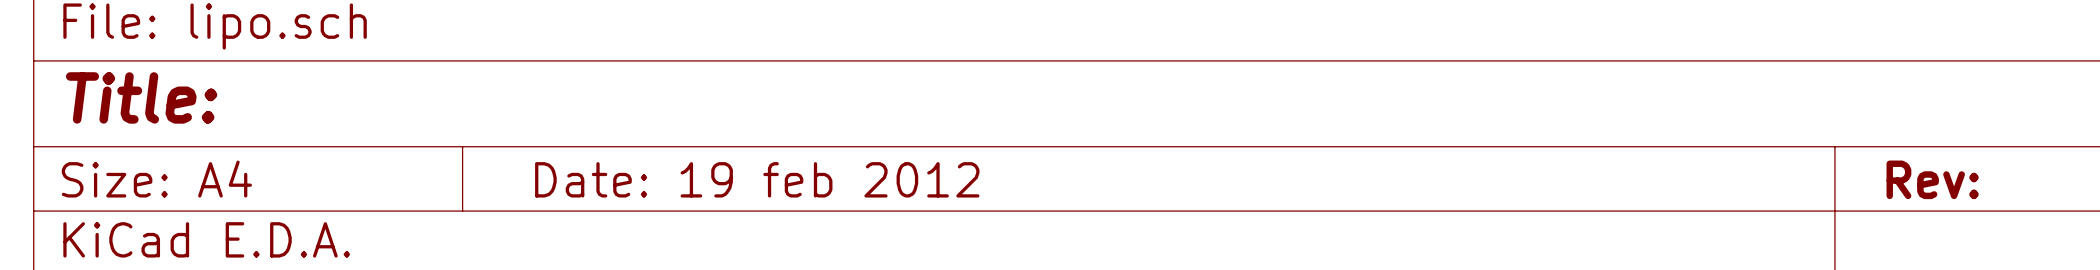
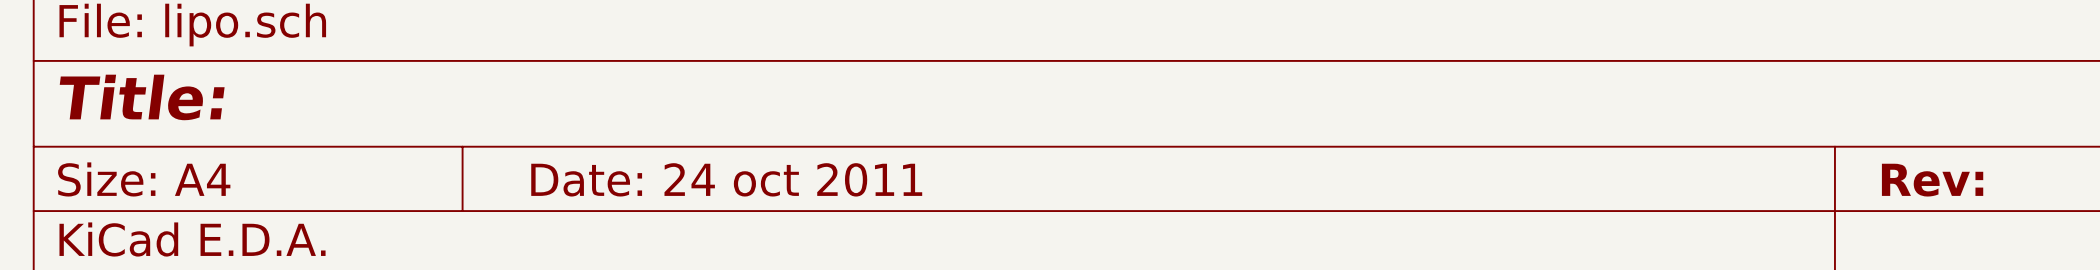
title block: Date: 19 feb 2012 (757, 179) -> Date: 24 oct 2011 (726, 179)

